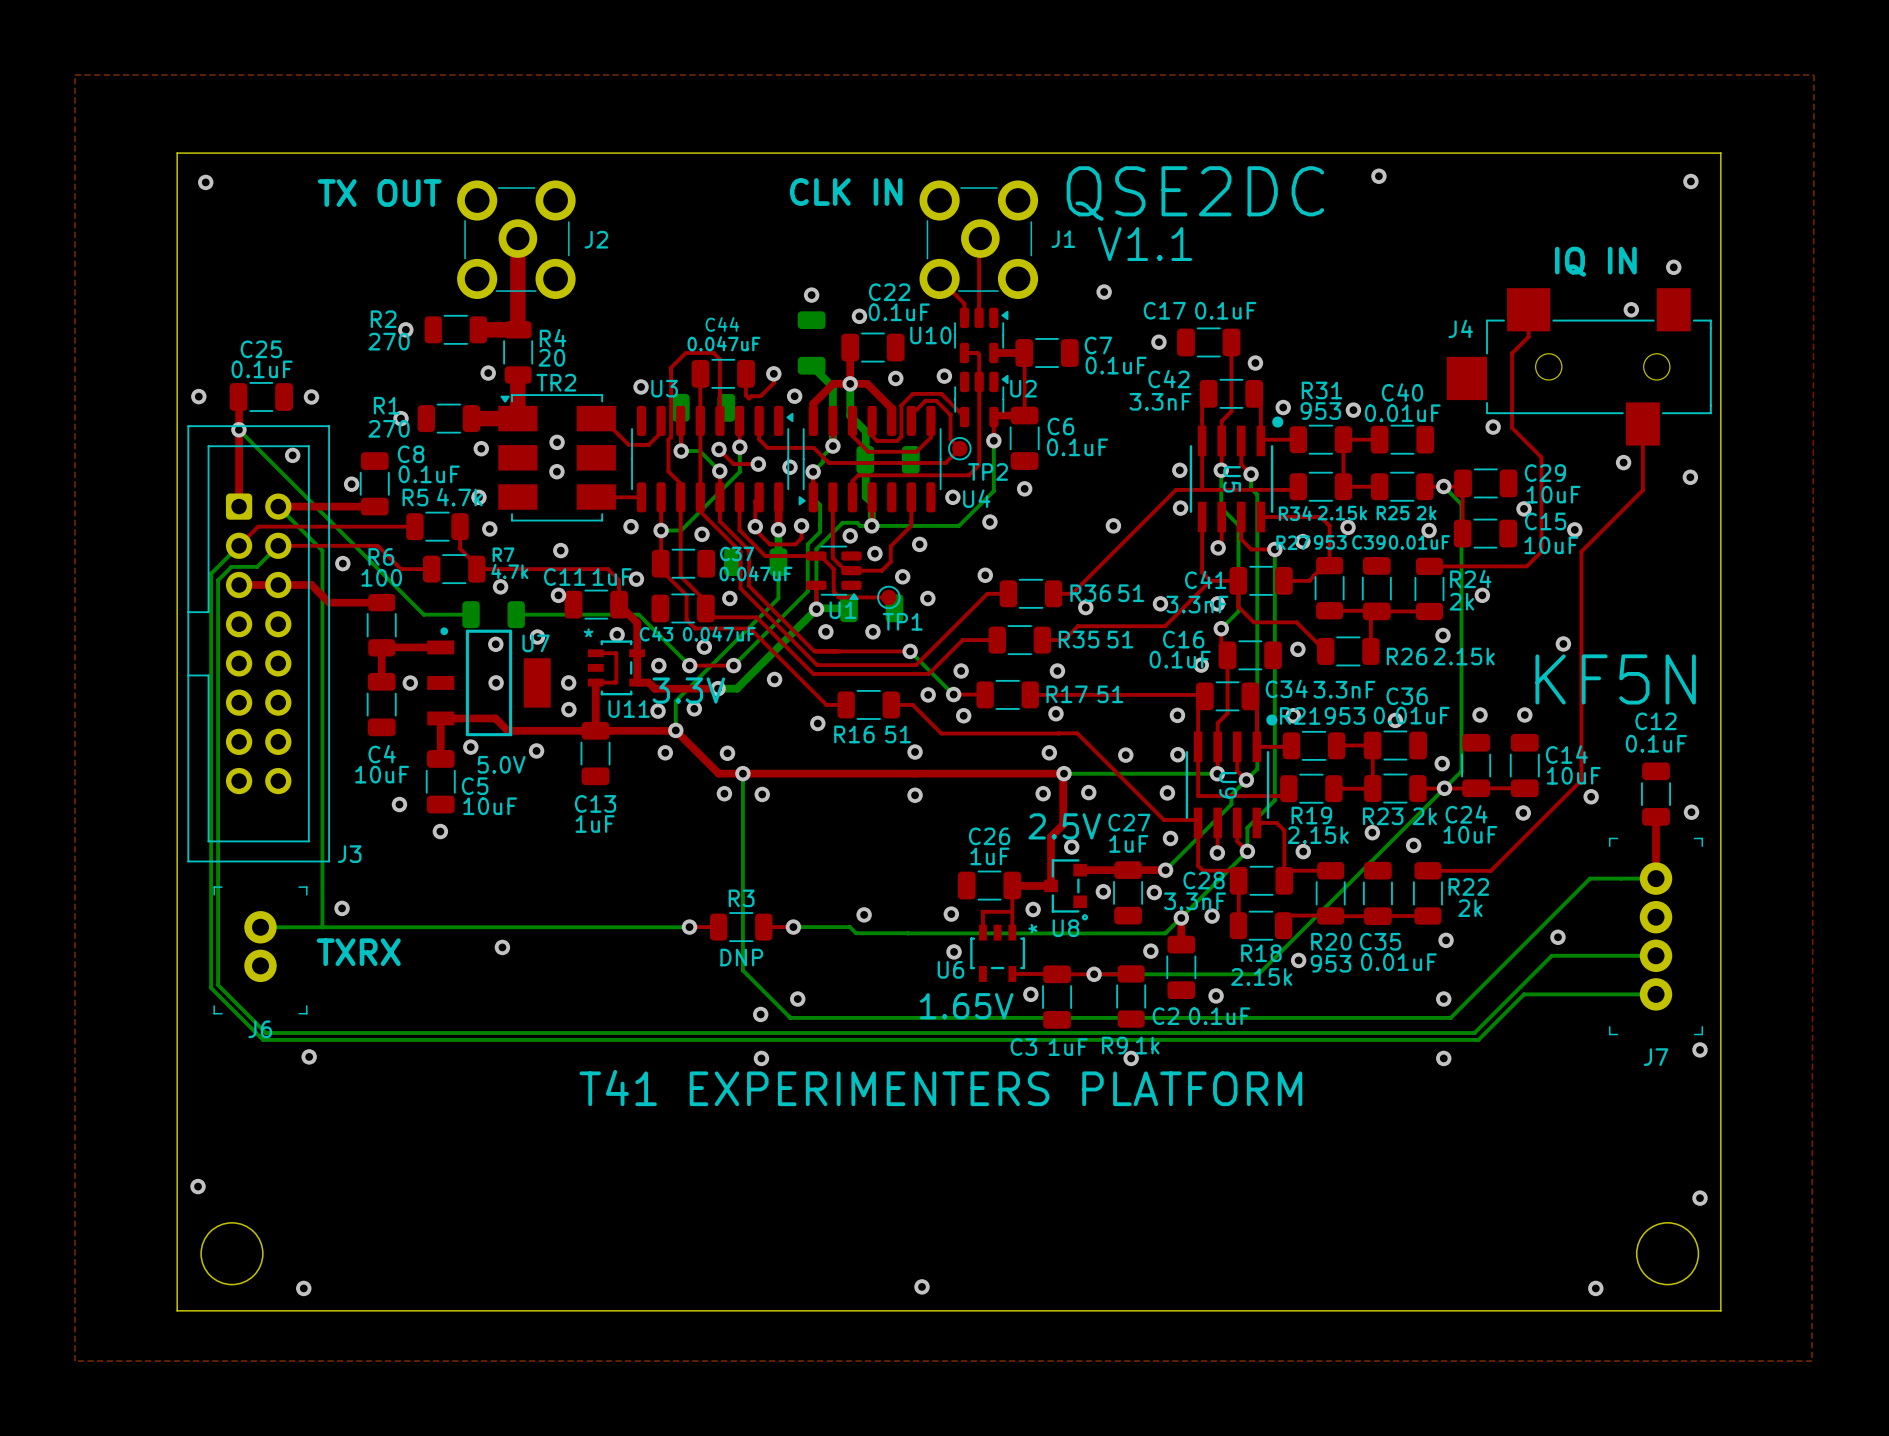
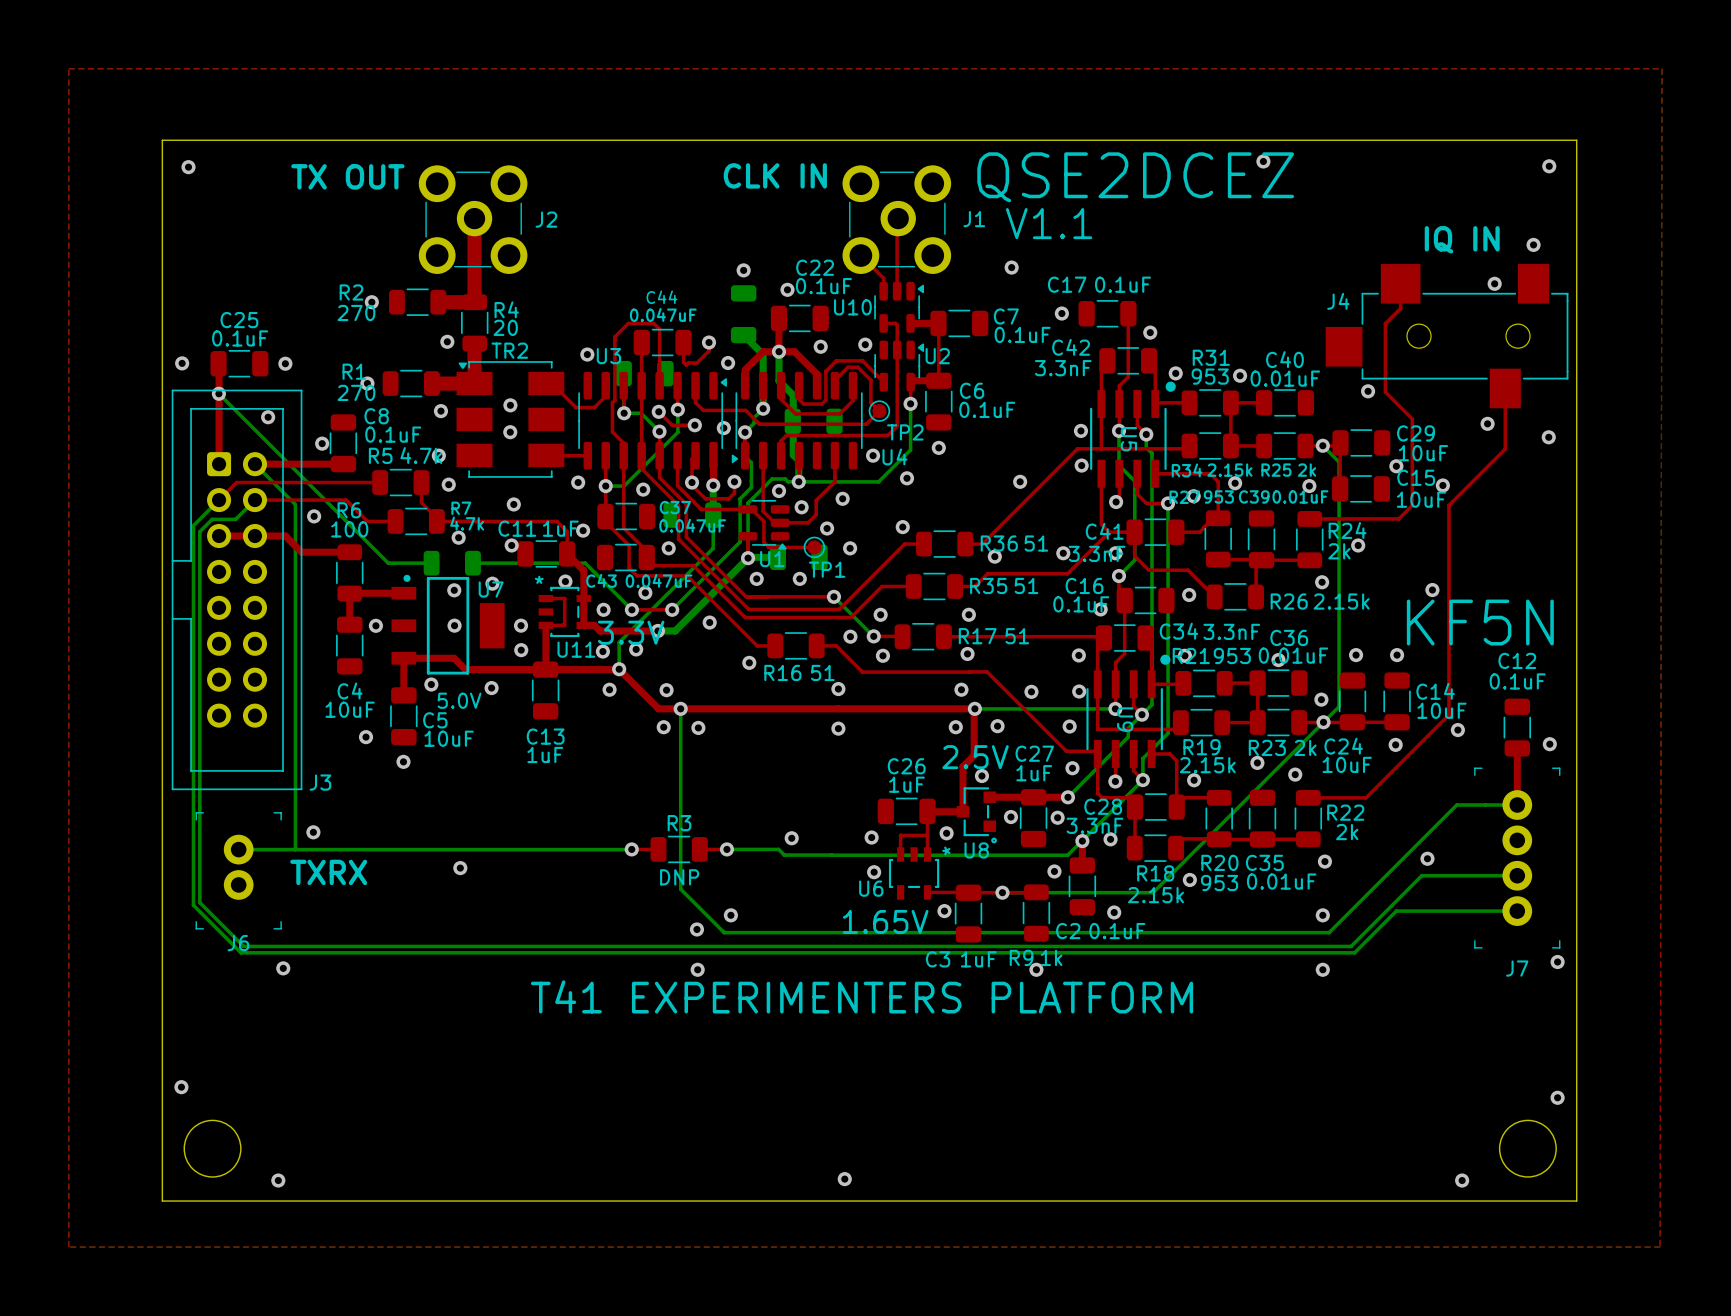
text: QSE2DC (1195, 193) -> QSE2DCEZ (1135, 177)

